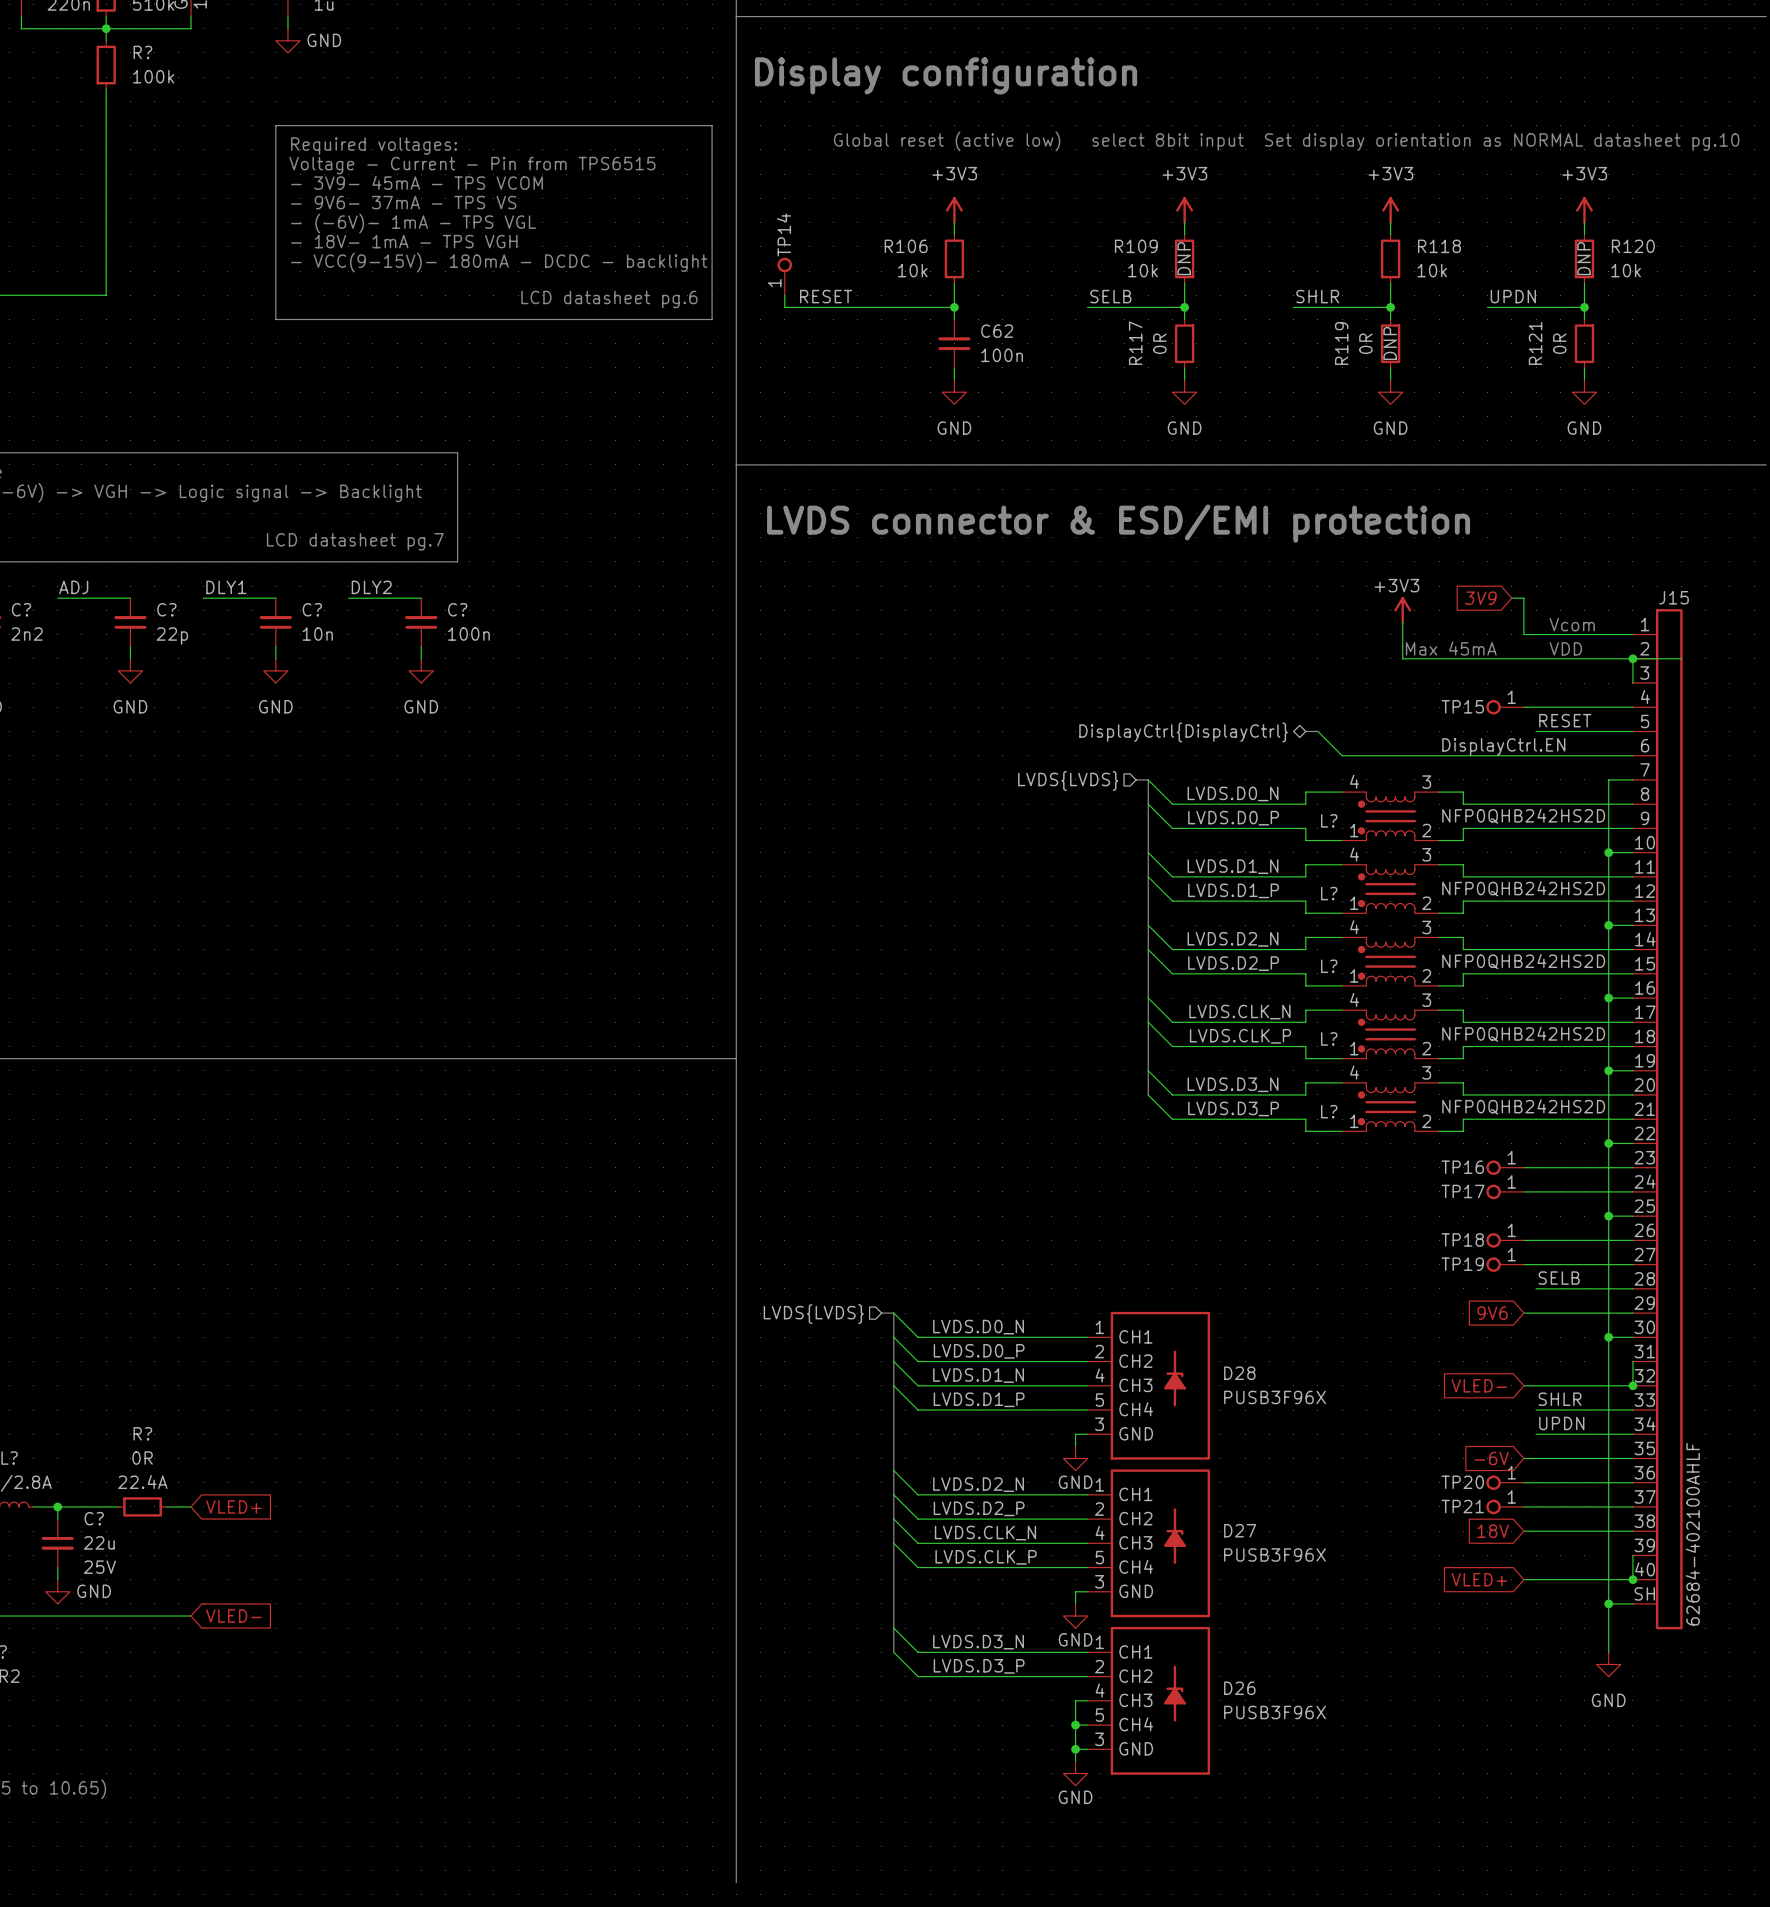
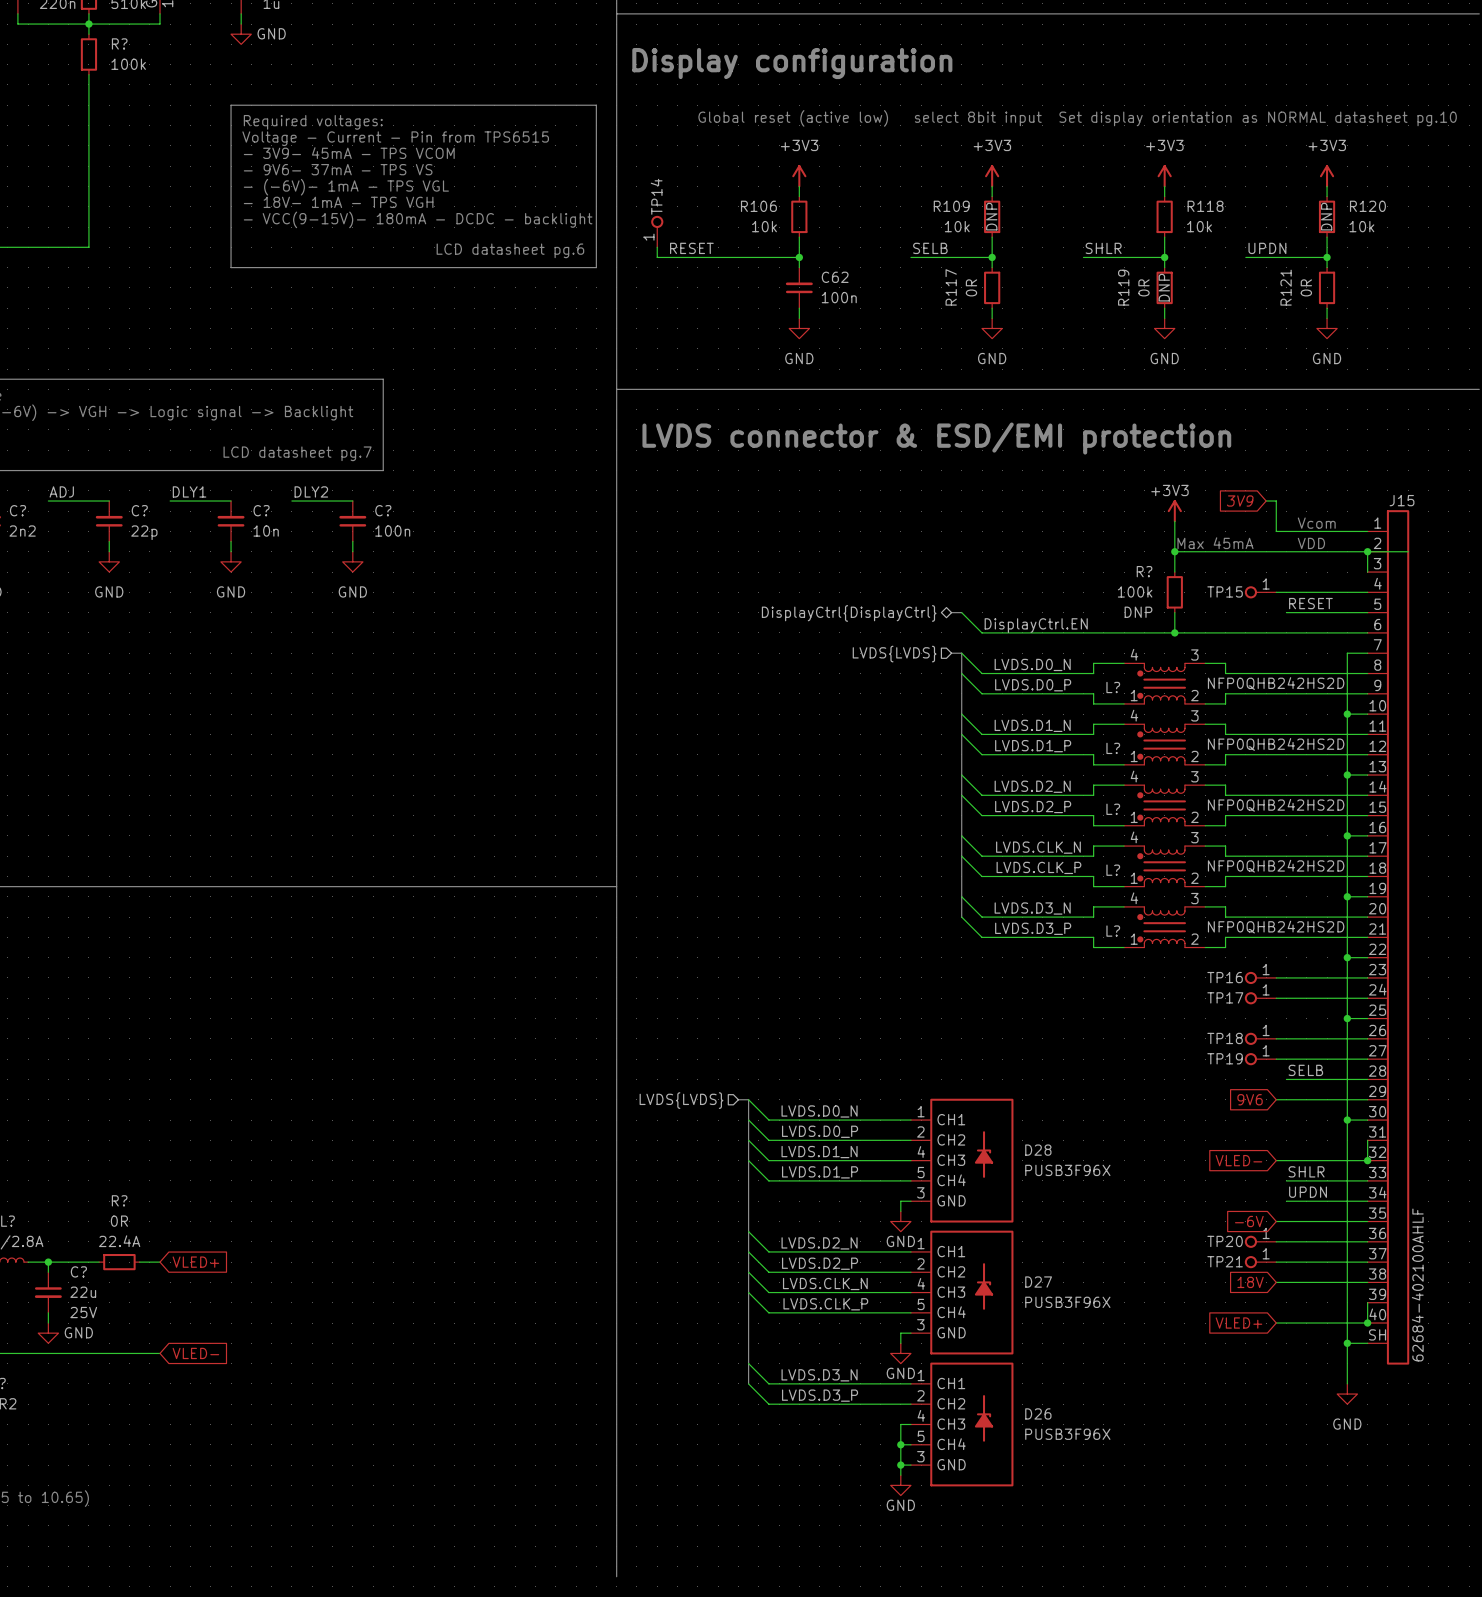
wire: none -> (1174, 551) (1174, 572)
junction: none -> (1174, 551)
R?: none -> (1174, 592)
bus: (1305, 731) (1317, 731) -> (951, 612) (961, 612)
wire: (1317, 731) (1342, 755) -> (961, 612) (982, 632) (1124, 632)
wire: none -> (1174, 612) (1174, 632)
hierarchical label position: DisplayCtrl{DisplayCtrl} (1183, 732) -> DisplayCtrl{DisplayCtrl} (849, 613)
label: none -> DisplayCtrl.EN (1036, 625)
label: DisplayCtrl.EN (1503, 746) -> none
junction: none -> (1174, 632)

